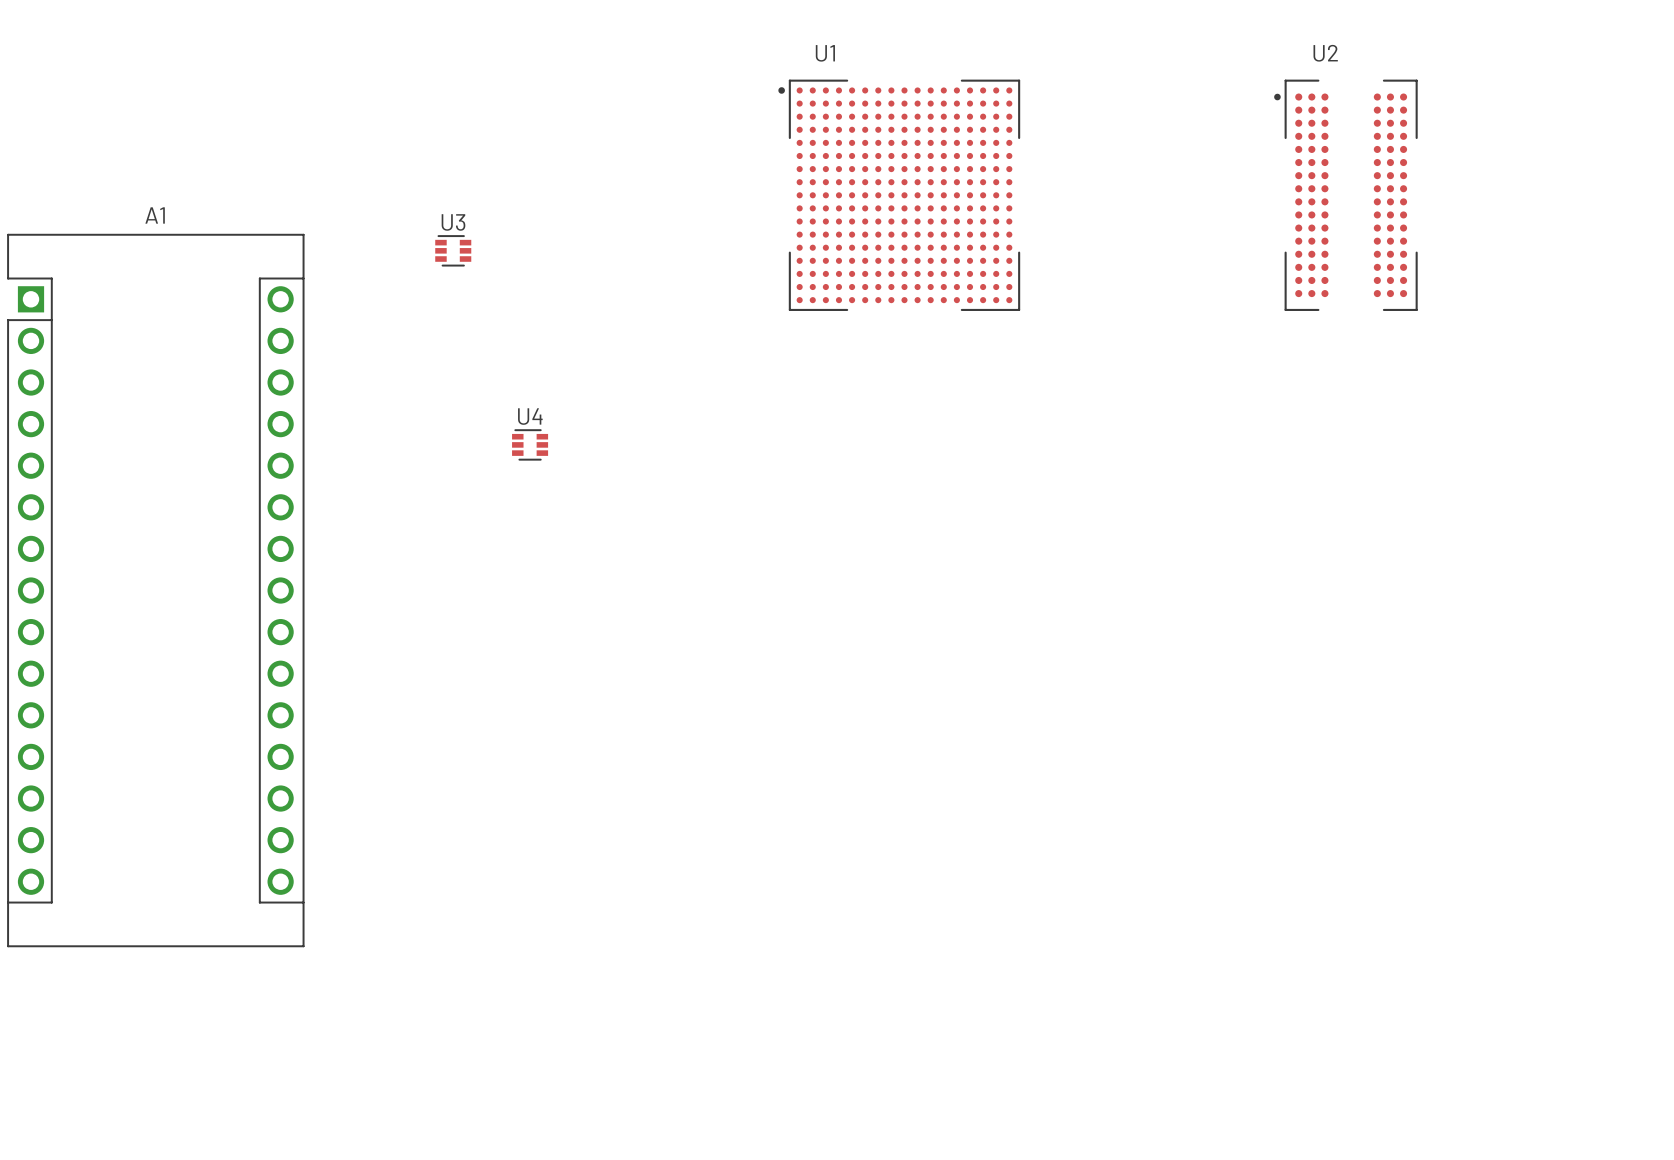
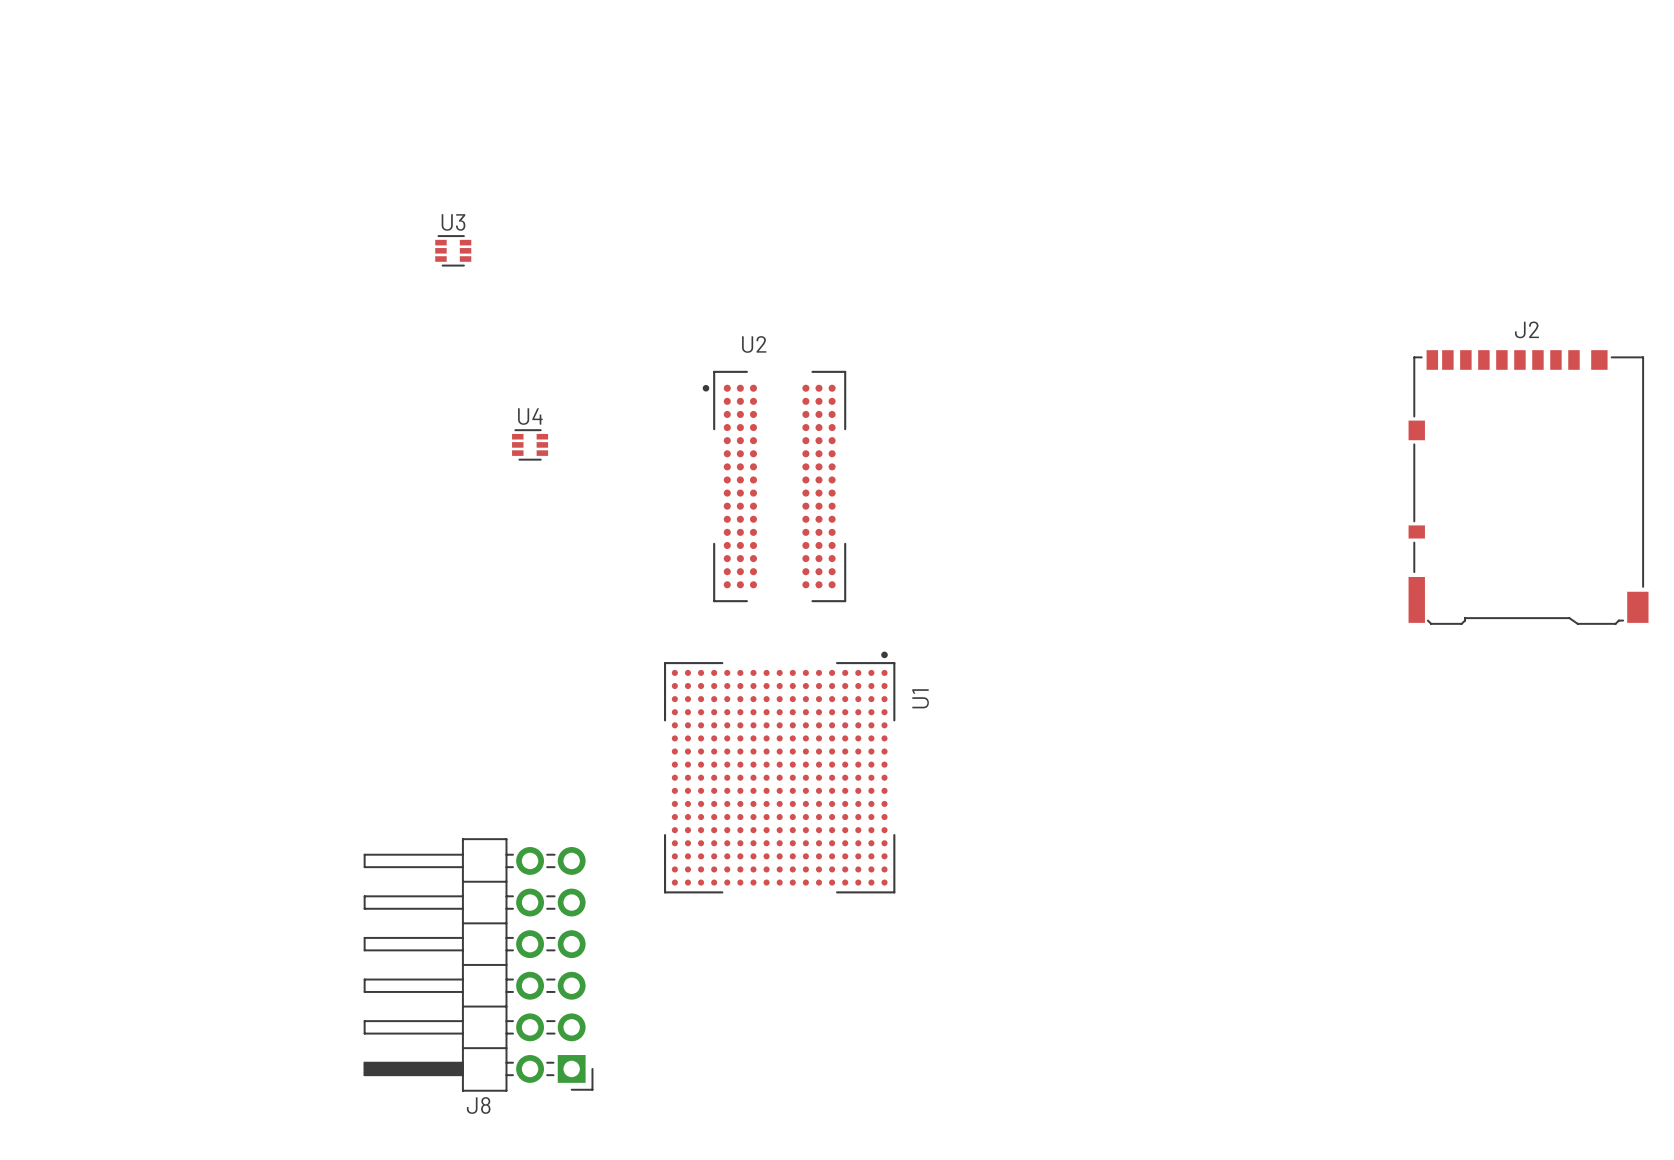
U1 rotation: 0° (899, 195) -> 90° clockwise (779, 772)
U1 position: (899, 195) -> (779, 772)
U2 position: (1345, 195) -> (774, 486)
J2: none -> (1528, 487)
A1: (155, 590) -> none
J8: none -> (478, 964)

